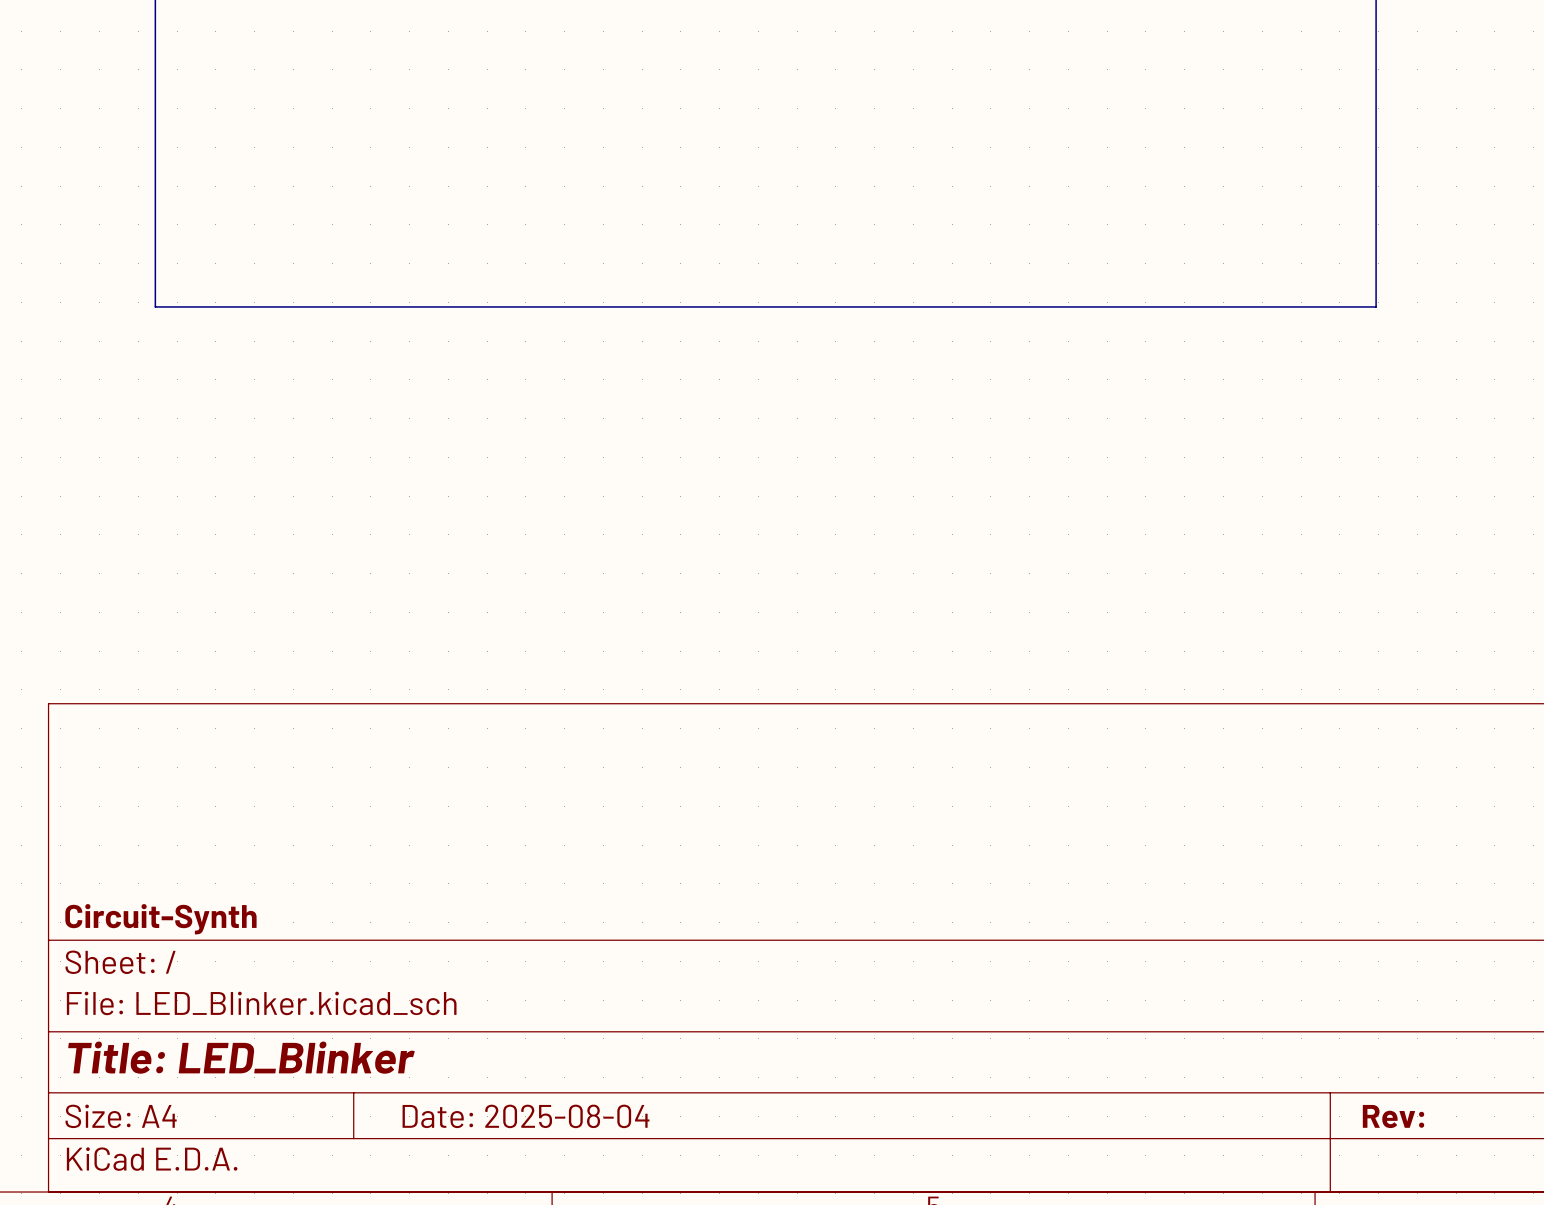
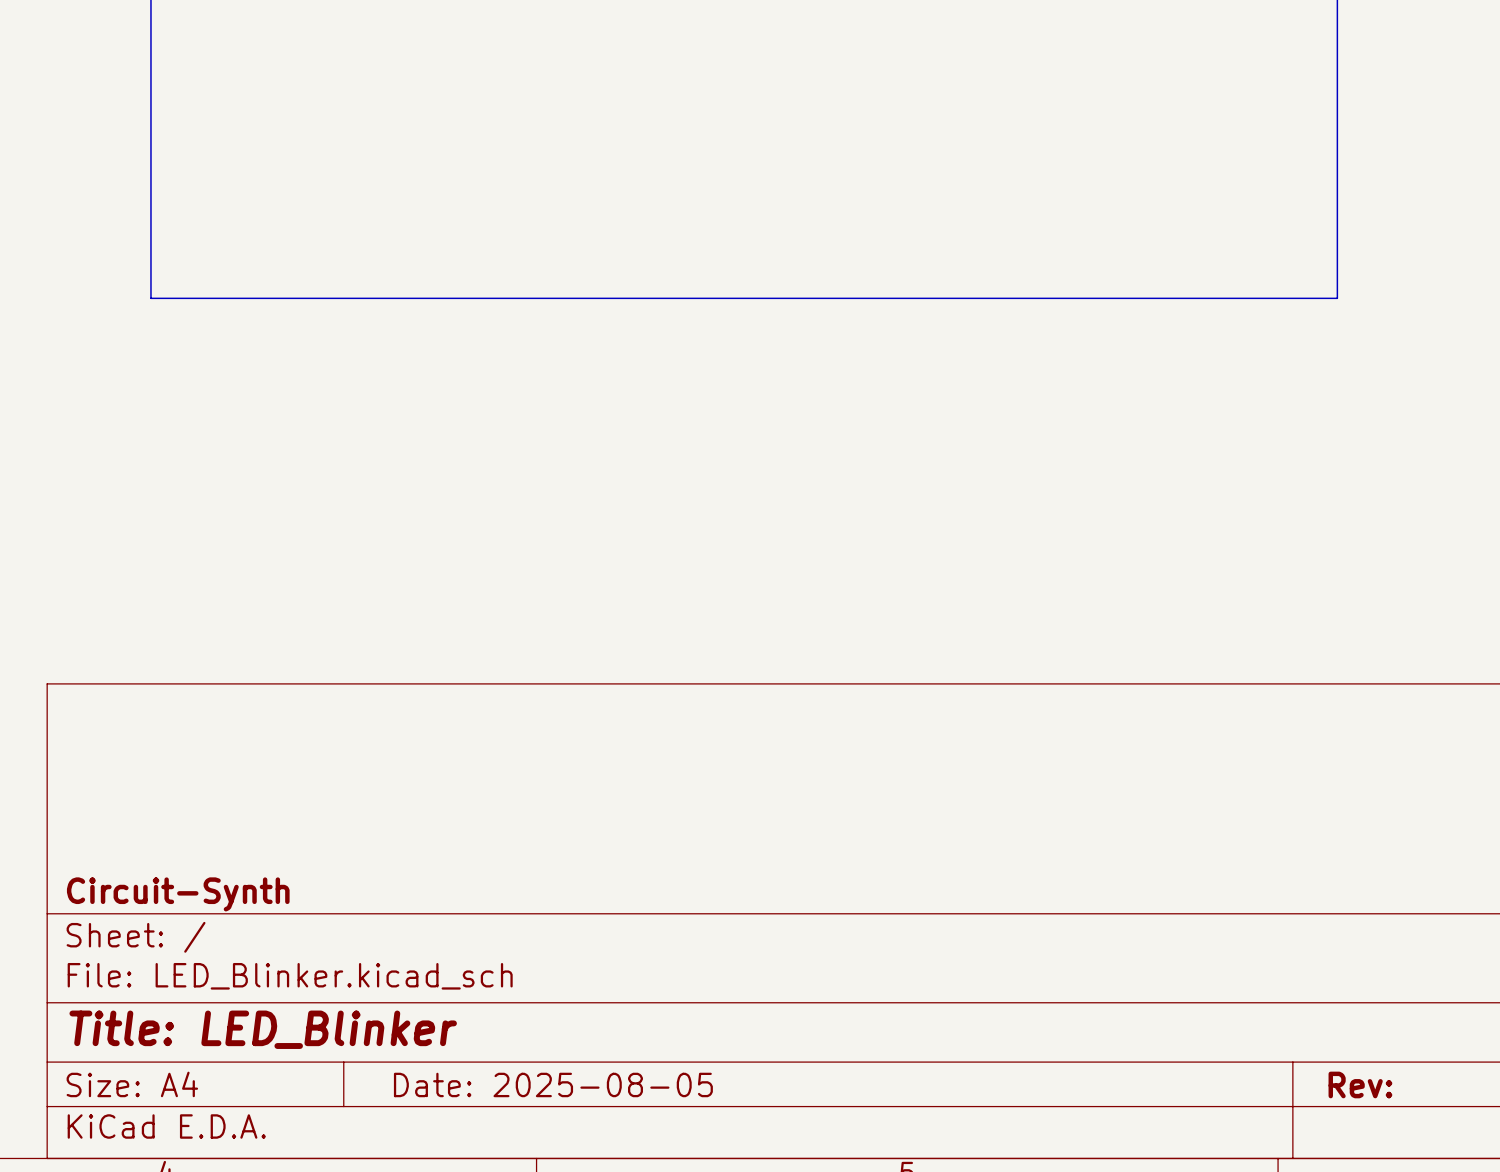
title block: Date: 2025-08-04 (526, 1116) -> Date: 2025-08-05 (553, 1084)

